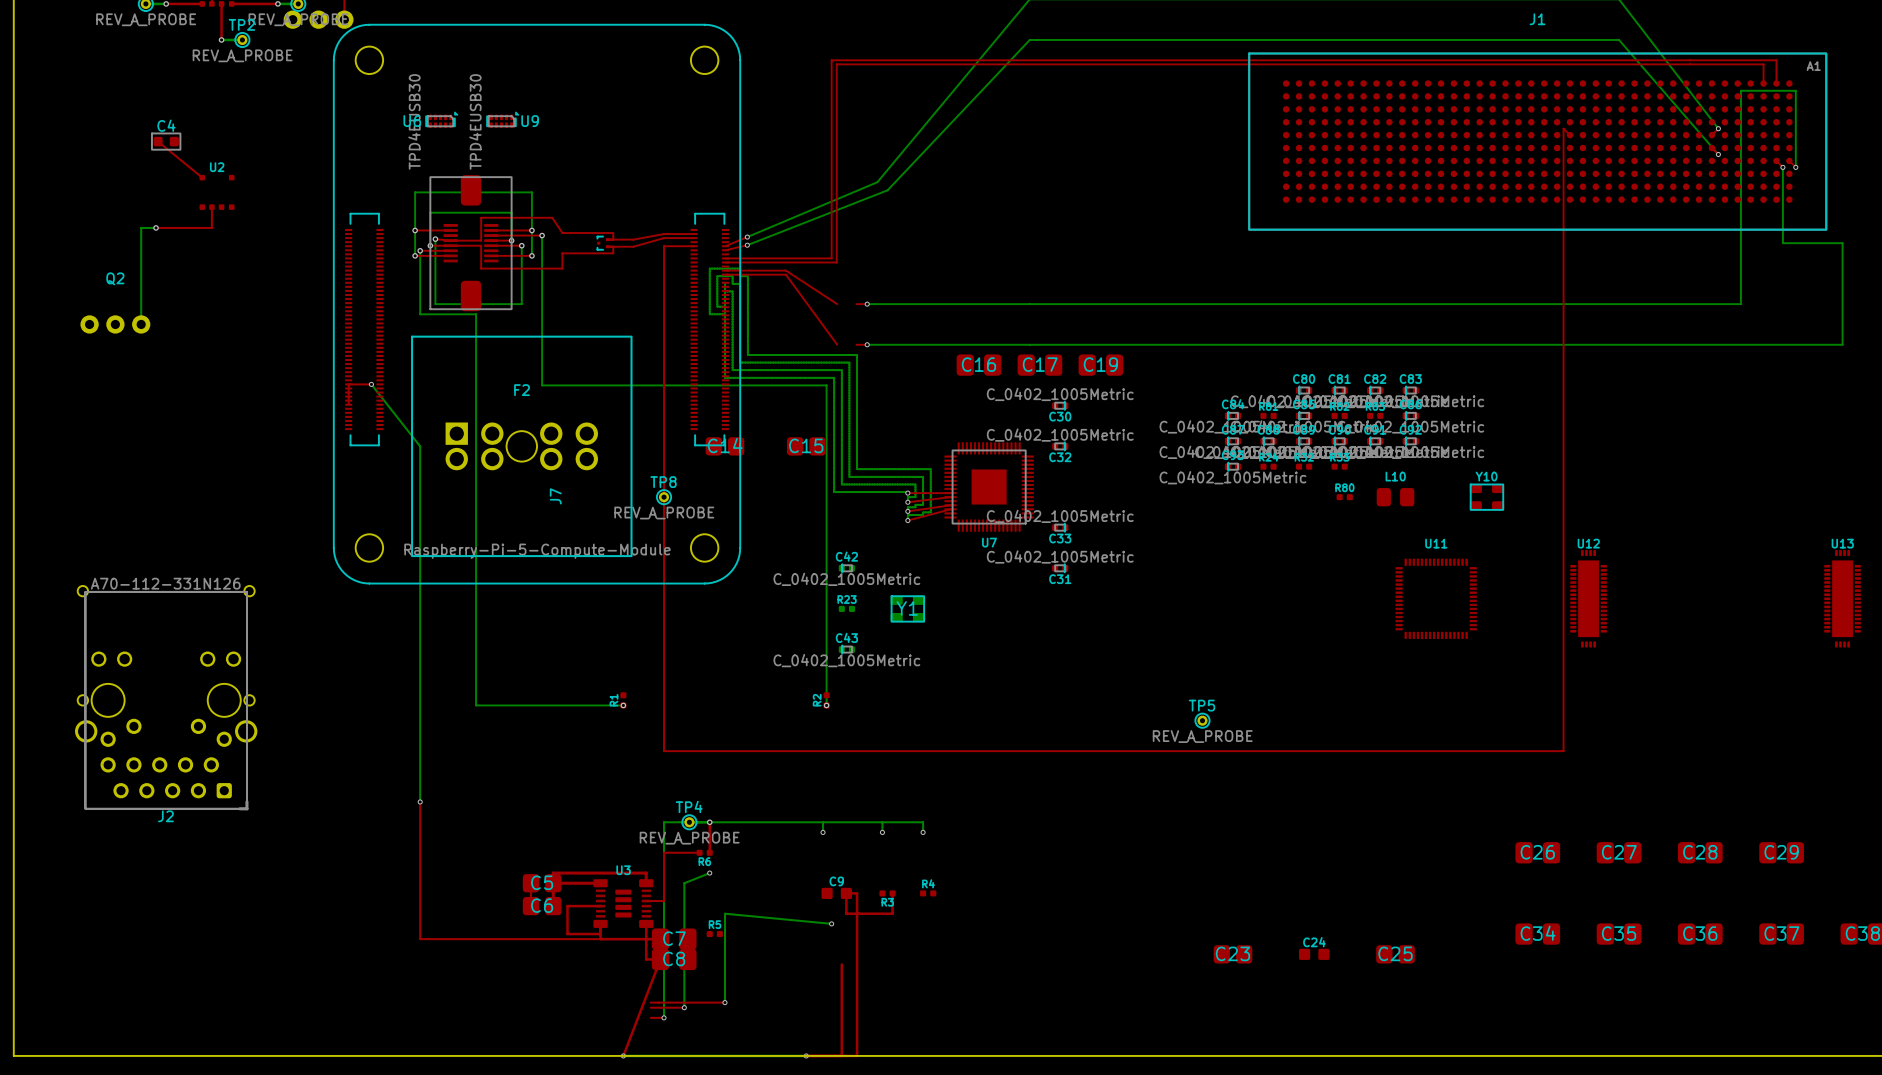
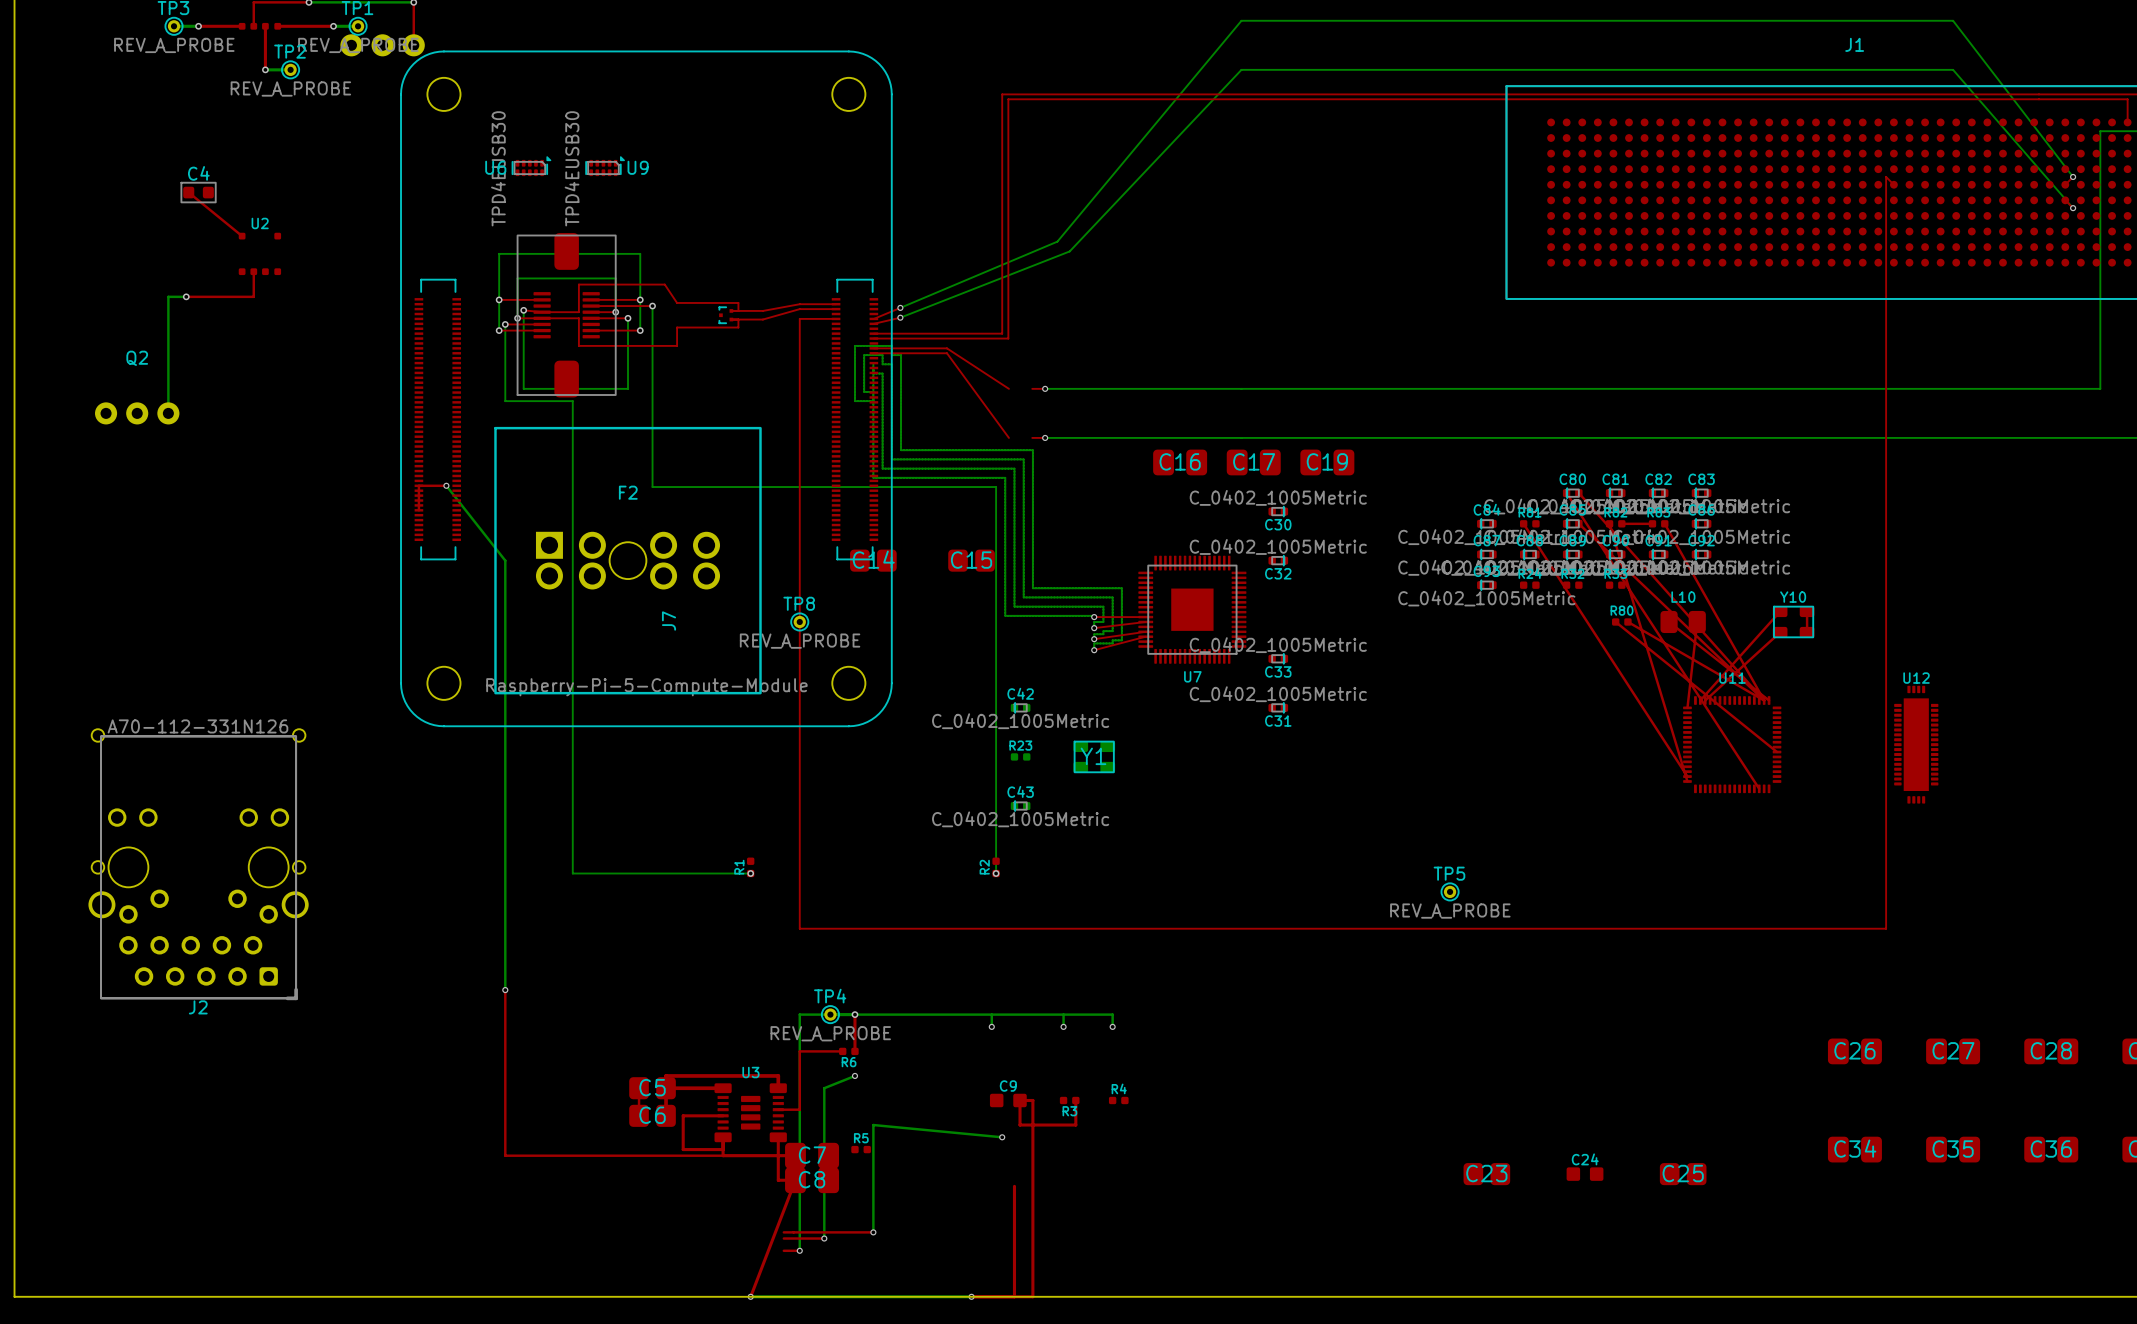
top track: none -> (1566, 493) (1759, 788)
top track: none -> (1578, 493) (1764, 700)
top track: none -> (1523, 523) (1687, 776)
top track: none -> (1578, 523) (1764, 700)
top track: none -> (1609, 523) (1687, 781)
top track: none -> (1621, 523) (1652, 523)
top track: none -> (1664, 523) (1764, 700)
top track: none -> (1780, 611) (1700, 700)
top track: none -> (1807, 611) (1807, 632)
top track: none -> (1615, 621) (1777, 752)
top track: none -> (1627, 621) (1764, 700)
top track: none -> (1669, 621) (1769, 700)
top track: none -> (1697, 621) (1687, 707)
top track: none -> (1780, 632) (1705, 700)

